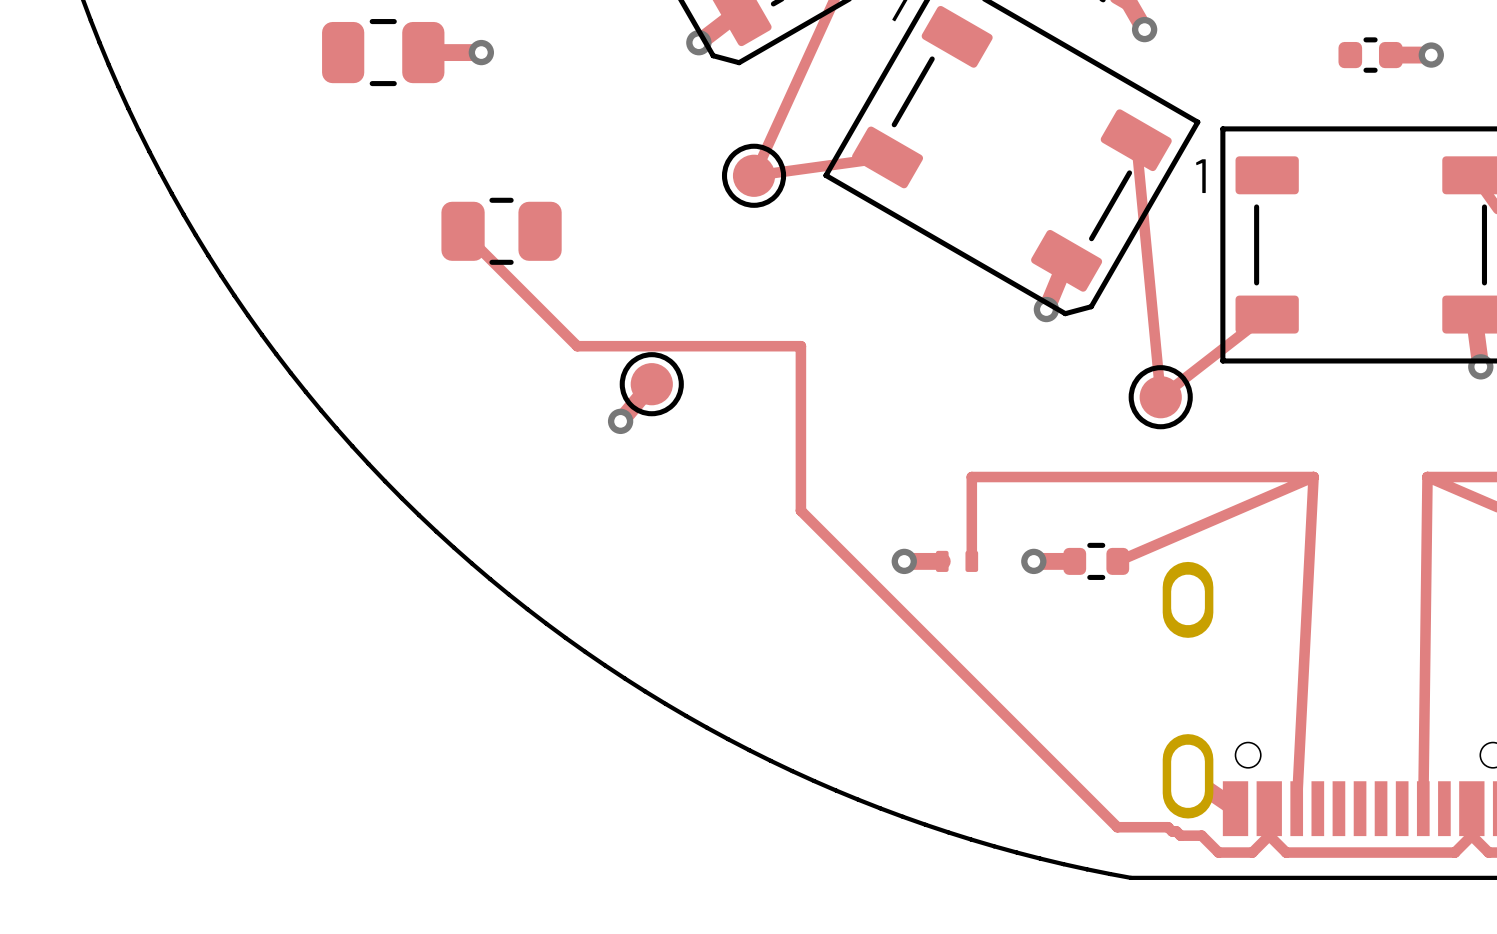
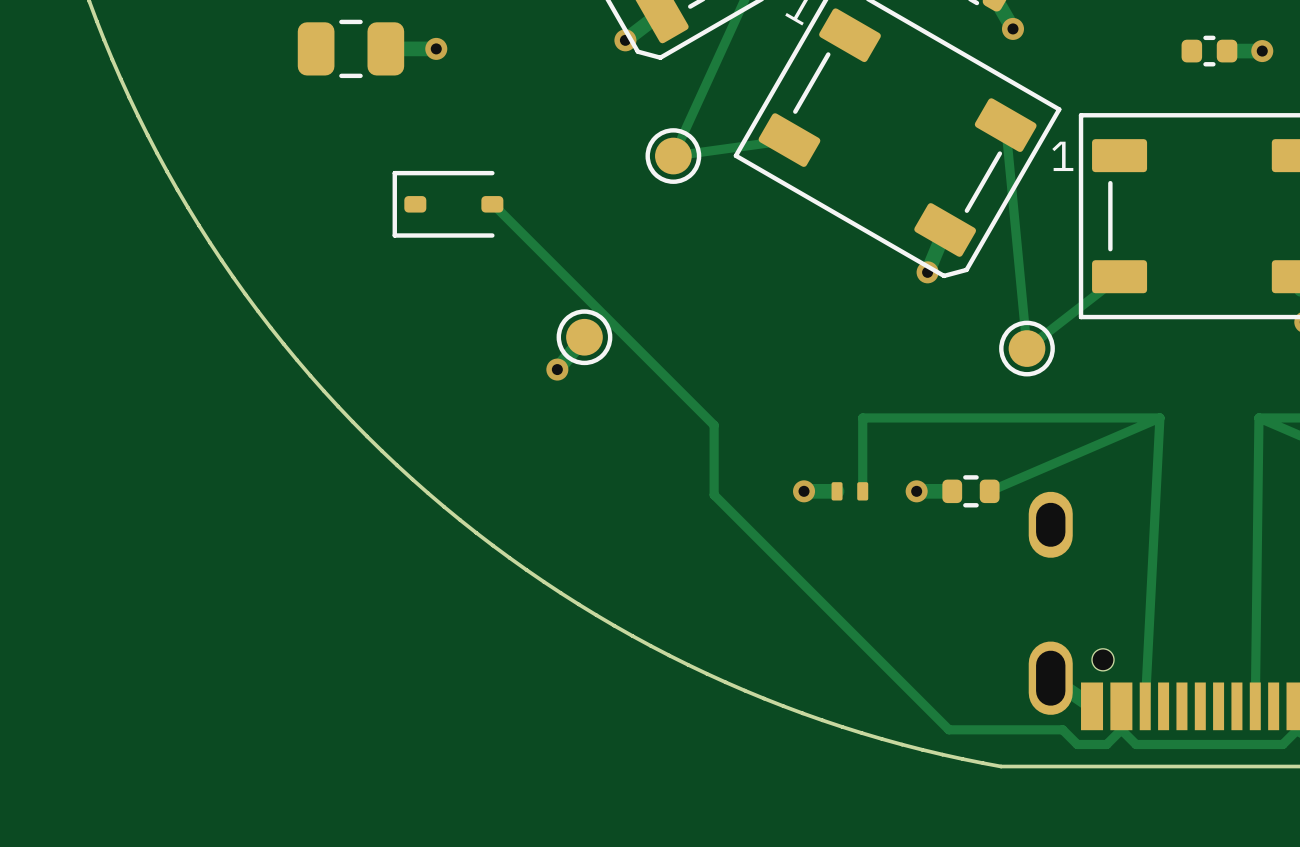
part footprint: [441, 197, 562, 265] -> [392, 170, 504, 238]
track: (463, 231) (577, 346) (800, 346) (800, 485) -> (492, 204) (714, 425)
track: (800, 510) (1117, 827) (1168, 827) (1180, 835) -> (714, 447) (714, 495) (948, 729) (1044, 729)

